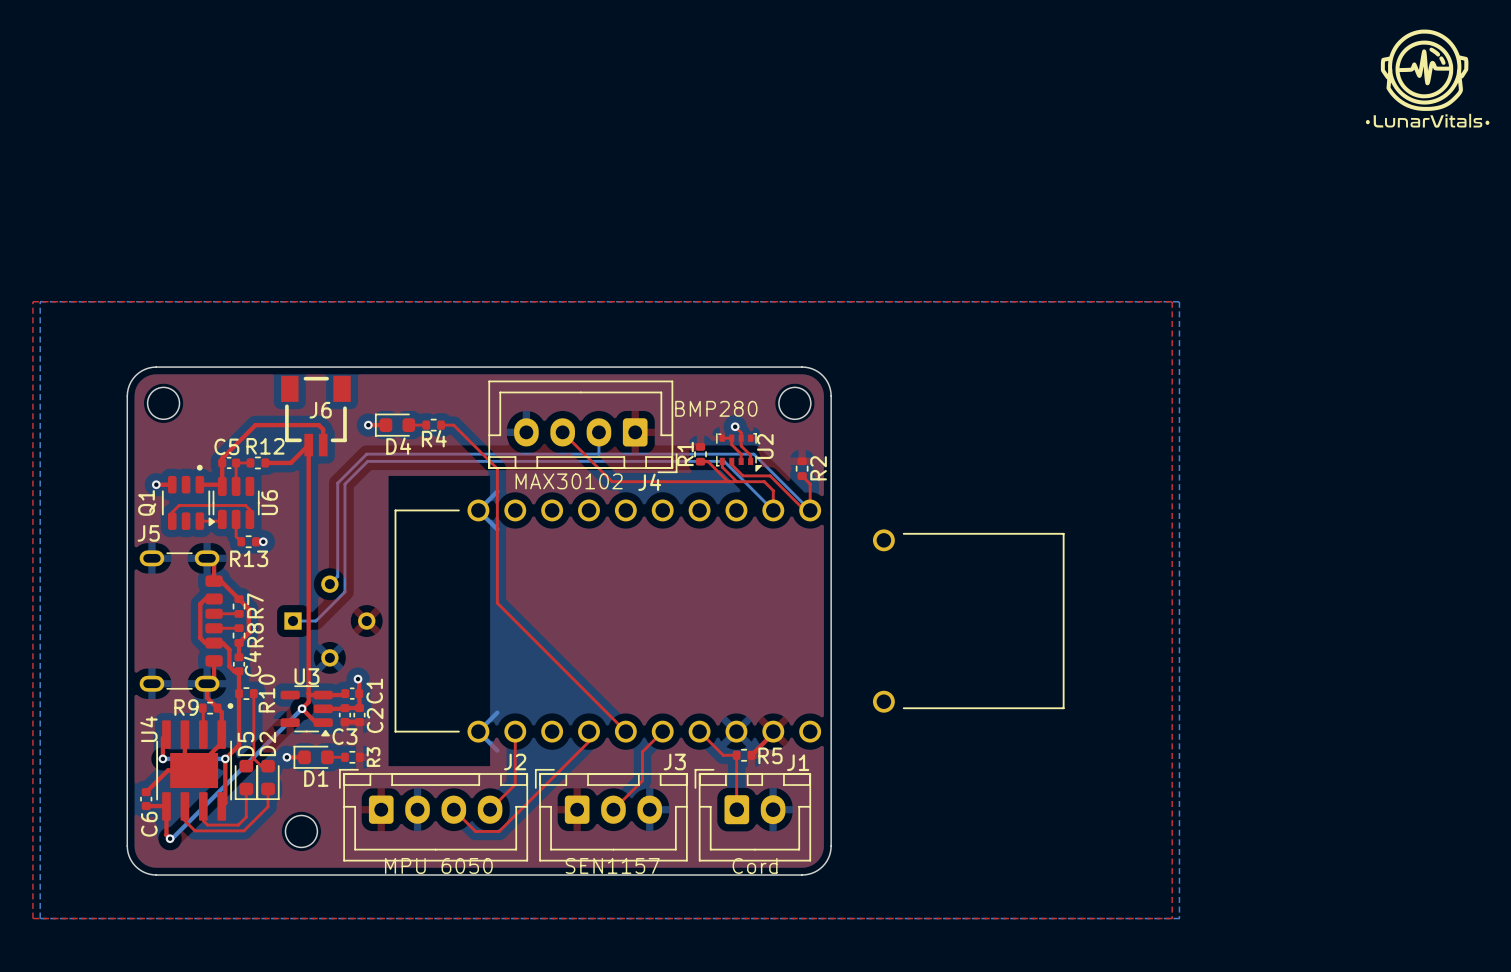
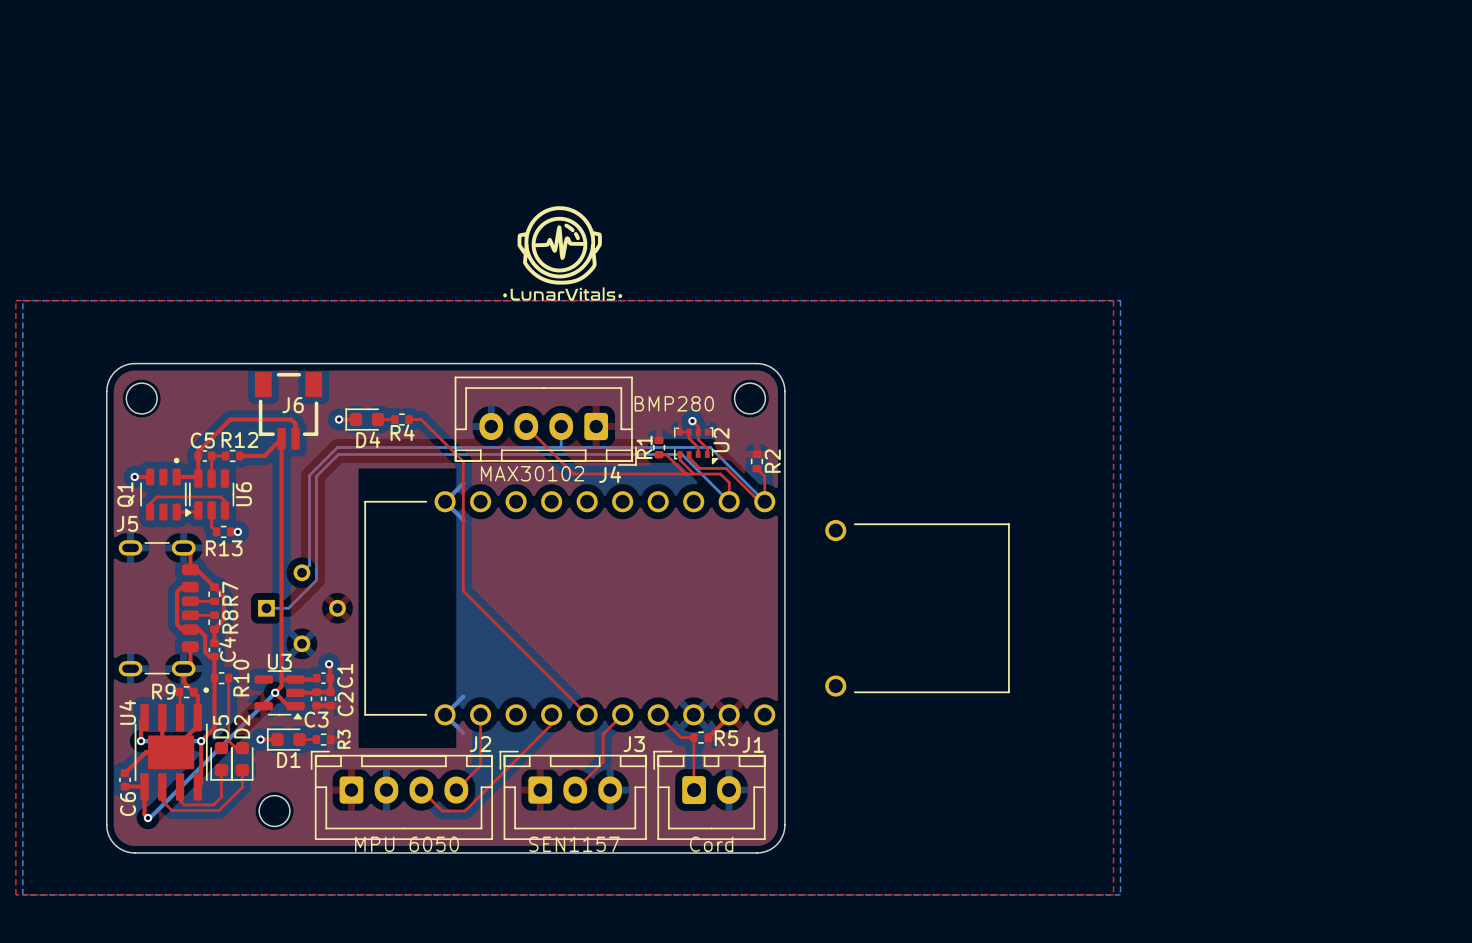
drawing: [1365, 29, 1490, 128] -> none
drawing: none -> [503, 206, 623, 301]

